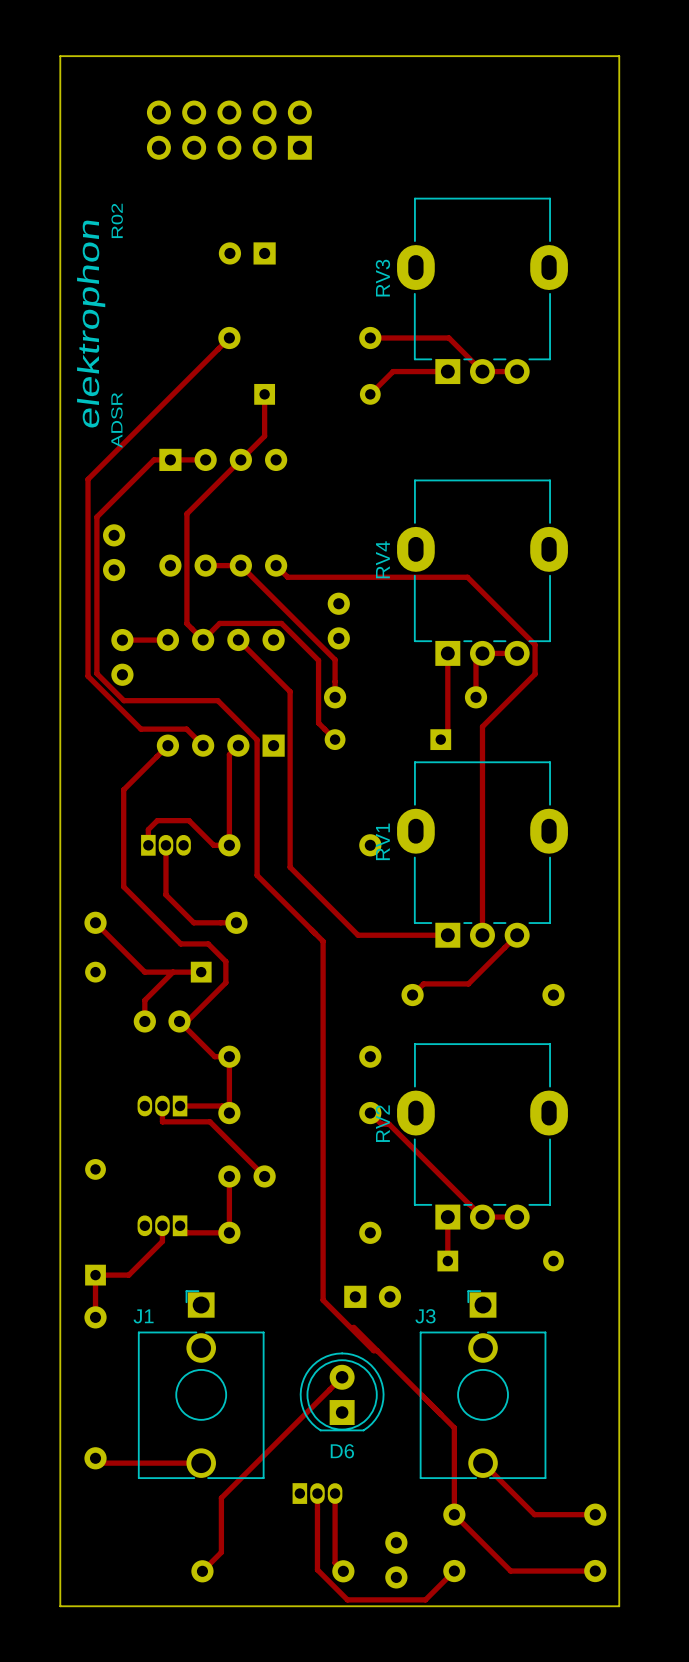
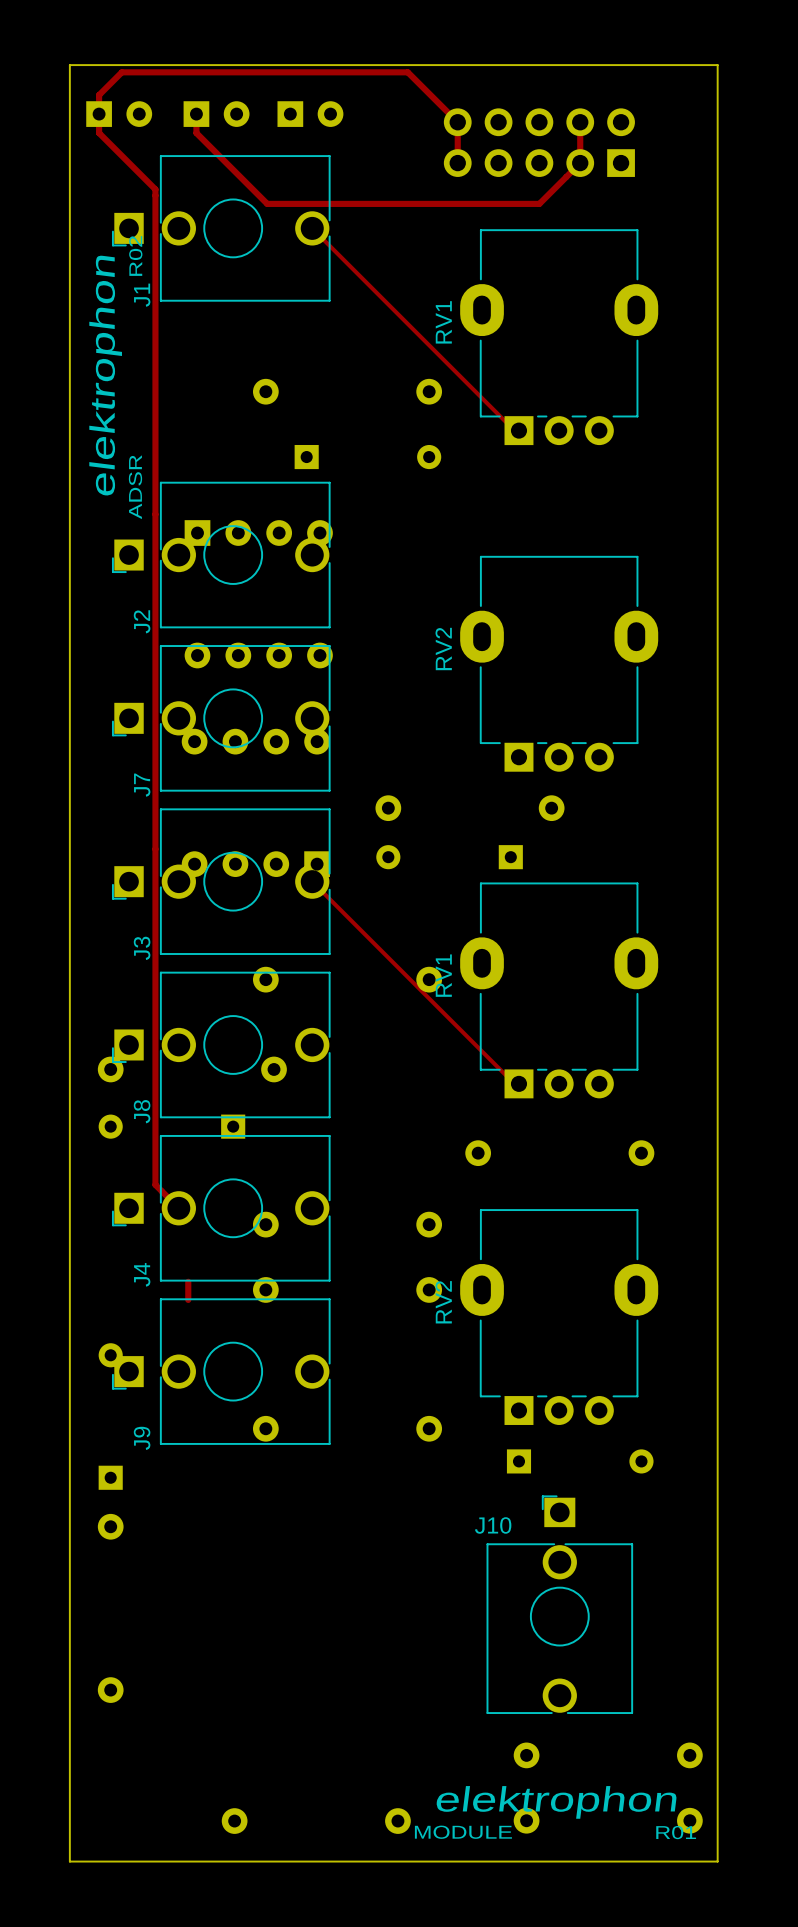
part: none -> (119, 114)
track: none -> (196, 114) (196, 133) (267, 203) (539, 203) (580, 163) (580, 122)
part: none -> (216, 114)
part: none -> (310, 114)
part position: (229, 130) -> (539, 142)
track: none -> (457, 163) (457, 122) (407, 72) (121, 72) (99, 95) (99, 133) (155, 189) (155, 1184) (178, 1208)
part: (247, 253) -> none
RV3 name: RV3 (382, 278) -> RV1 (443, 322)
track: (229, 338) (88, 479) (88, 676) (140, 729) (186, 729) (203, 745) -> none
track: (370, 338) (448, 338) (482, 371) (517, 371) -> none
track: (443, 371) (393, 371) (370, 394) -> (514, 430) (312, 228)
track: (264, 394) (264, 436) (186, 513) (186, 623) (203, 639) (219, 623) (281, 623) (318, 660) (318, 723) (335, 739) -> none
track: (205, 459) (154, 459) (96, 517) (96, 673) (123, 700) (217, 700) (257, 739) (257, 875) (323, 941) (323, 1300) (373, 1350) (377, 1350) -> none
J2: none -> (221, 555)
part: (114, 552) -> none
RV4 name: RV4 (382, 559) -> RV2 (443, 649)
track: (205, 565) (240, 565) (335, 659) (335, 697) -> none
track: (276, 565) (287, 577) (467, 577) (535, 644) (535, 674) (482, 726) (482, 935) -> none
J7: none -> (221, 718)
part: (338, 621) -> none
track: (238, 639) (290, 691) (290, 867) (358, 935) (443, 935) -> (312, 881) (514, 1083)
track: (122, 640) (167, 640) -> none
track: (447, 653) (447, 732) (440, 739) -> none
track: (517, 653) (482, 653) (476, 659) (476, 697) -> none
part: (122, 657) -> none
track: (167, 745) (123, 789) (123, 886) (180, 943) (208, 943) (225, 961) (225, 982) (187, 1021) (179, 1021) (214, 1056) (229, 1056) (229, 1113) (222, 1106) (180, 1106) -> none
track: (238, 745) (229, 754) (229, 845) (213, 845) (189, 820) (157, 820) (148, 829) (148, 845) -> none
J3: none -> (221, 881)
track: (165, 845) (165, 894) -> none
part: (165, 845) -> none
track: (165, 894) (193, 922) (236, 922) -> none
J8: none -> (221, 1044)
track: (95, 922) (144, 972) (201, 972) -> none
track: (517, 935) (468, 983) (423, 983) (412, 995) -> none
track: (173, 972) (144, 1000) (144, 1021) -> none
part: (162, 1021) -> none
J4: none -> (221, 1208)
part: (162, 1106) -> none
track: (370, 1113) (381, 1124) (389, 1124) (482, 1217) (517, 1217) -> none
track: (162, 1121) (209, 1121) (264, 1176) -> none
track: (229, 1176) (229, 1232) (187, 1232) (180, 1225) -> none
part: (247, 1176) -> none
J9: none -> (221, 1371)
track: (447, 1217) (447, 1261) -> none
track: (162, 1225) (162, 1241) (128, 1275) (95, 1275) (95, 1317) -> none
part: (162, 1225) -> none
part: (372, 1296) -> none
J3 name: J3 (425, 1316) -> J10 (493, 1525)
track: (353, 1327) (454, 1427) (454, 1514) (510, 1571) (595, 1571) -> none
track: (342, 1377) (221, 1498) (221, 1552) (202, 1571) -> none
J1 rotation: 0° (201, 1384) -> 90° counterclockwise (221, 228)
J1 position: (201, 1384) -> (221, 228)
D6: (342, 1391) -> none
track: (95, 1458) (100, 1463) (201, 1463) -> none
track: (483, 1463) (534, 1514) (595, 1514) -> none
track: (317, 1493) (317, 1569) (347, 1599) (425, 1599) (454, 1571) -> none
part: (317, 1493) -> none
track: (335, 1493) (335, 1563) (343, 1571) -> none
drawing: none -> [414, 1786, 697, 1840]
part: (396, 1560) -> none

